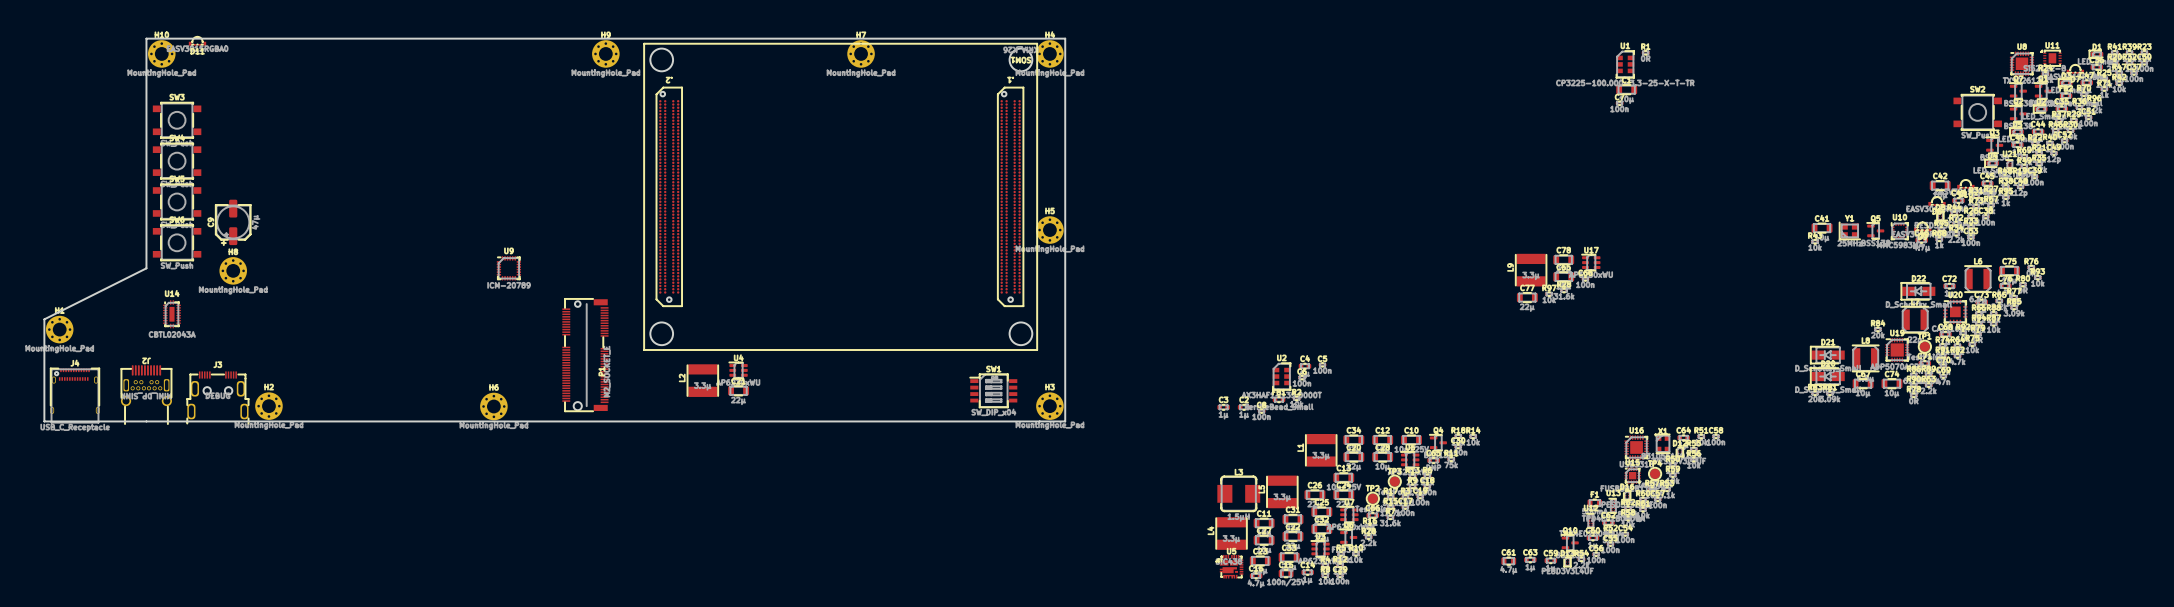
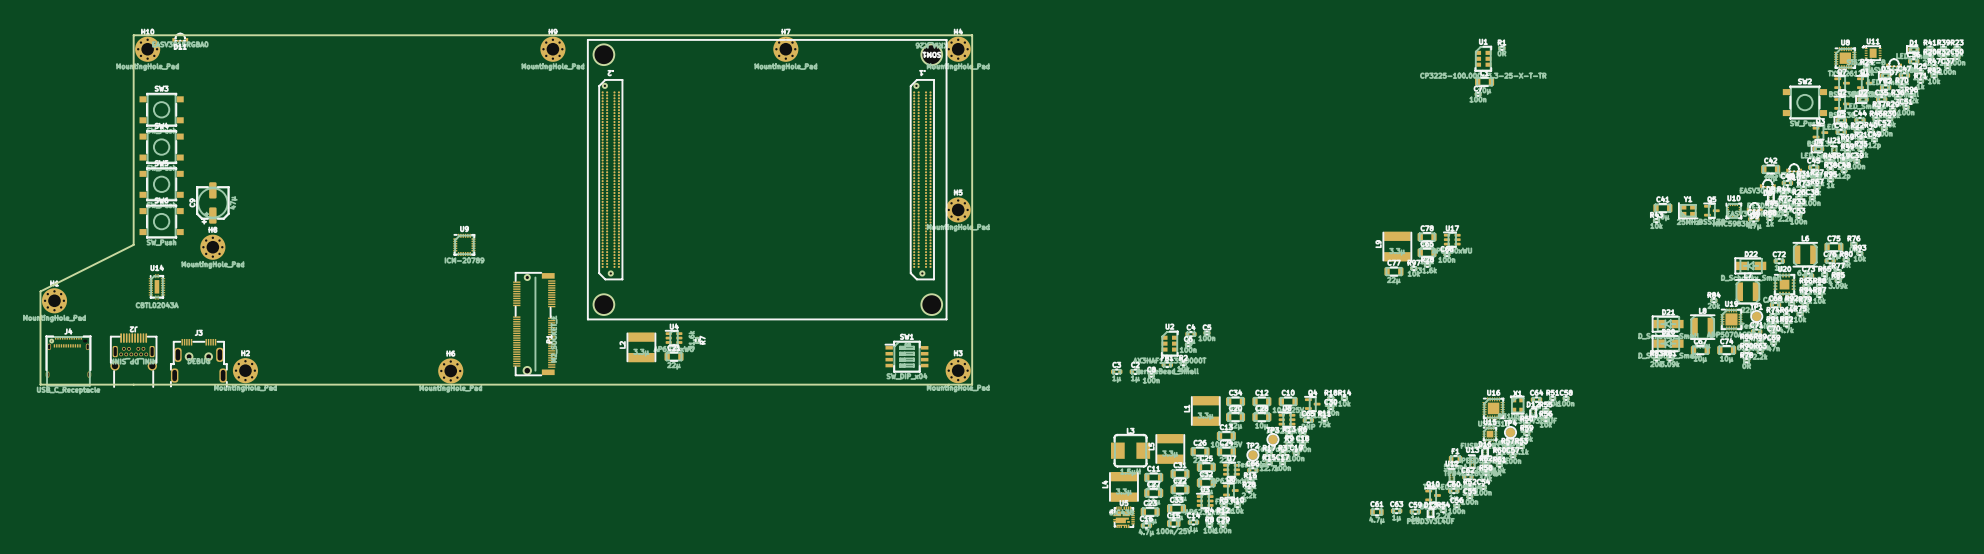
part rotation: 0° (1390, 517) -> 90° clockwise (697, 340)
part position: (1390, 517) -> (697, 340)

